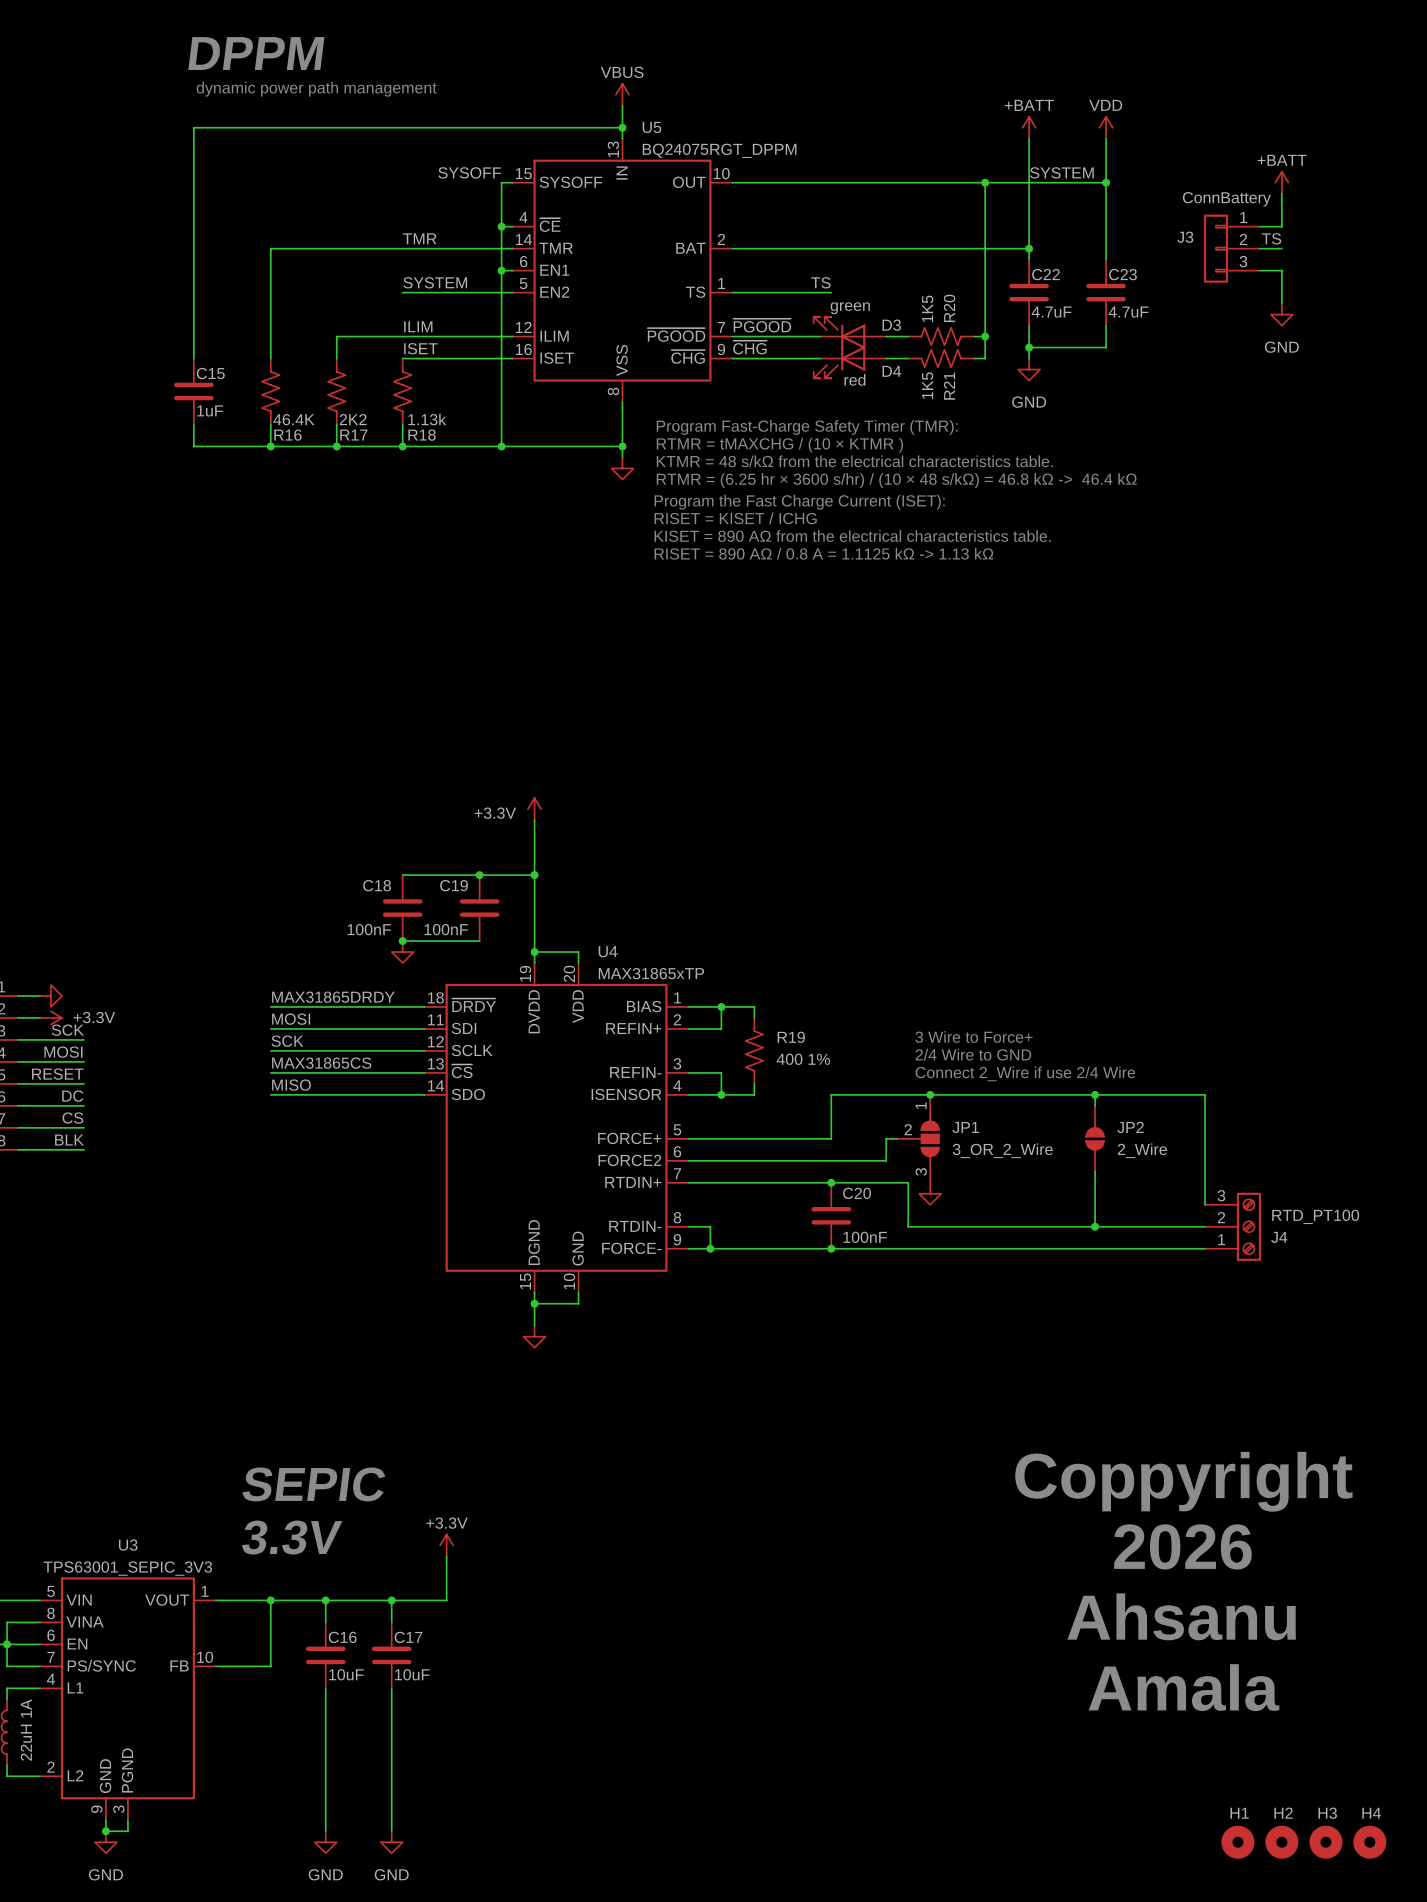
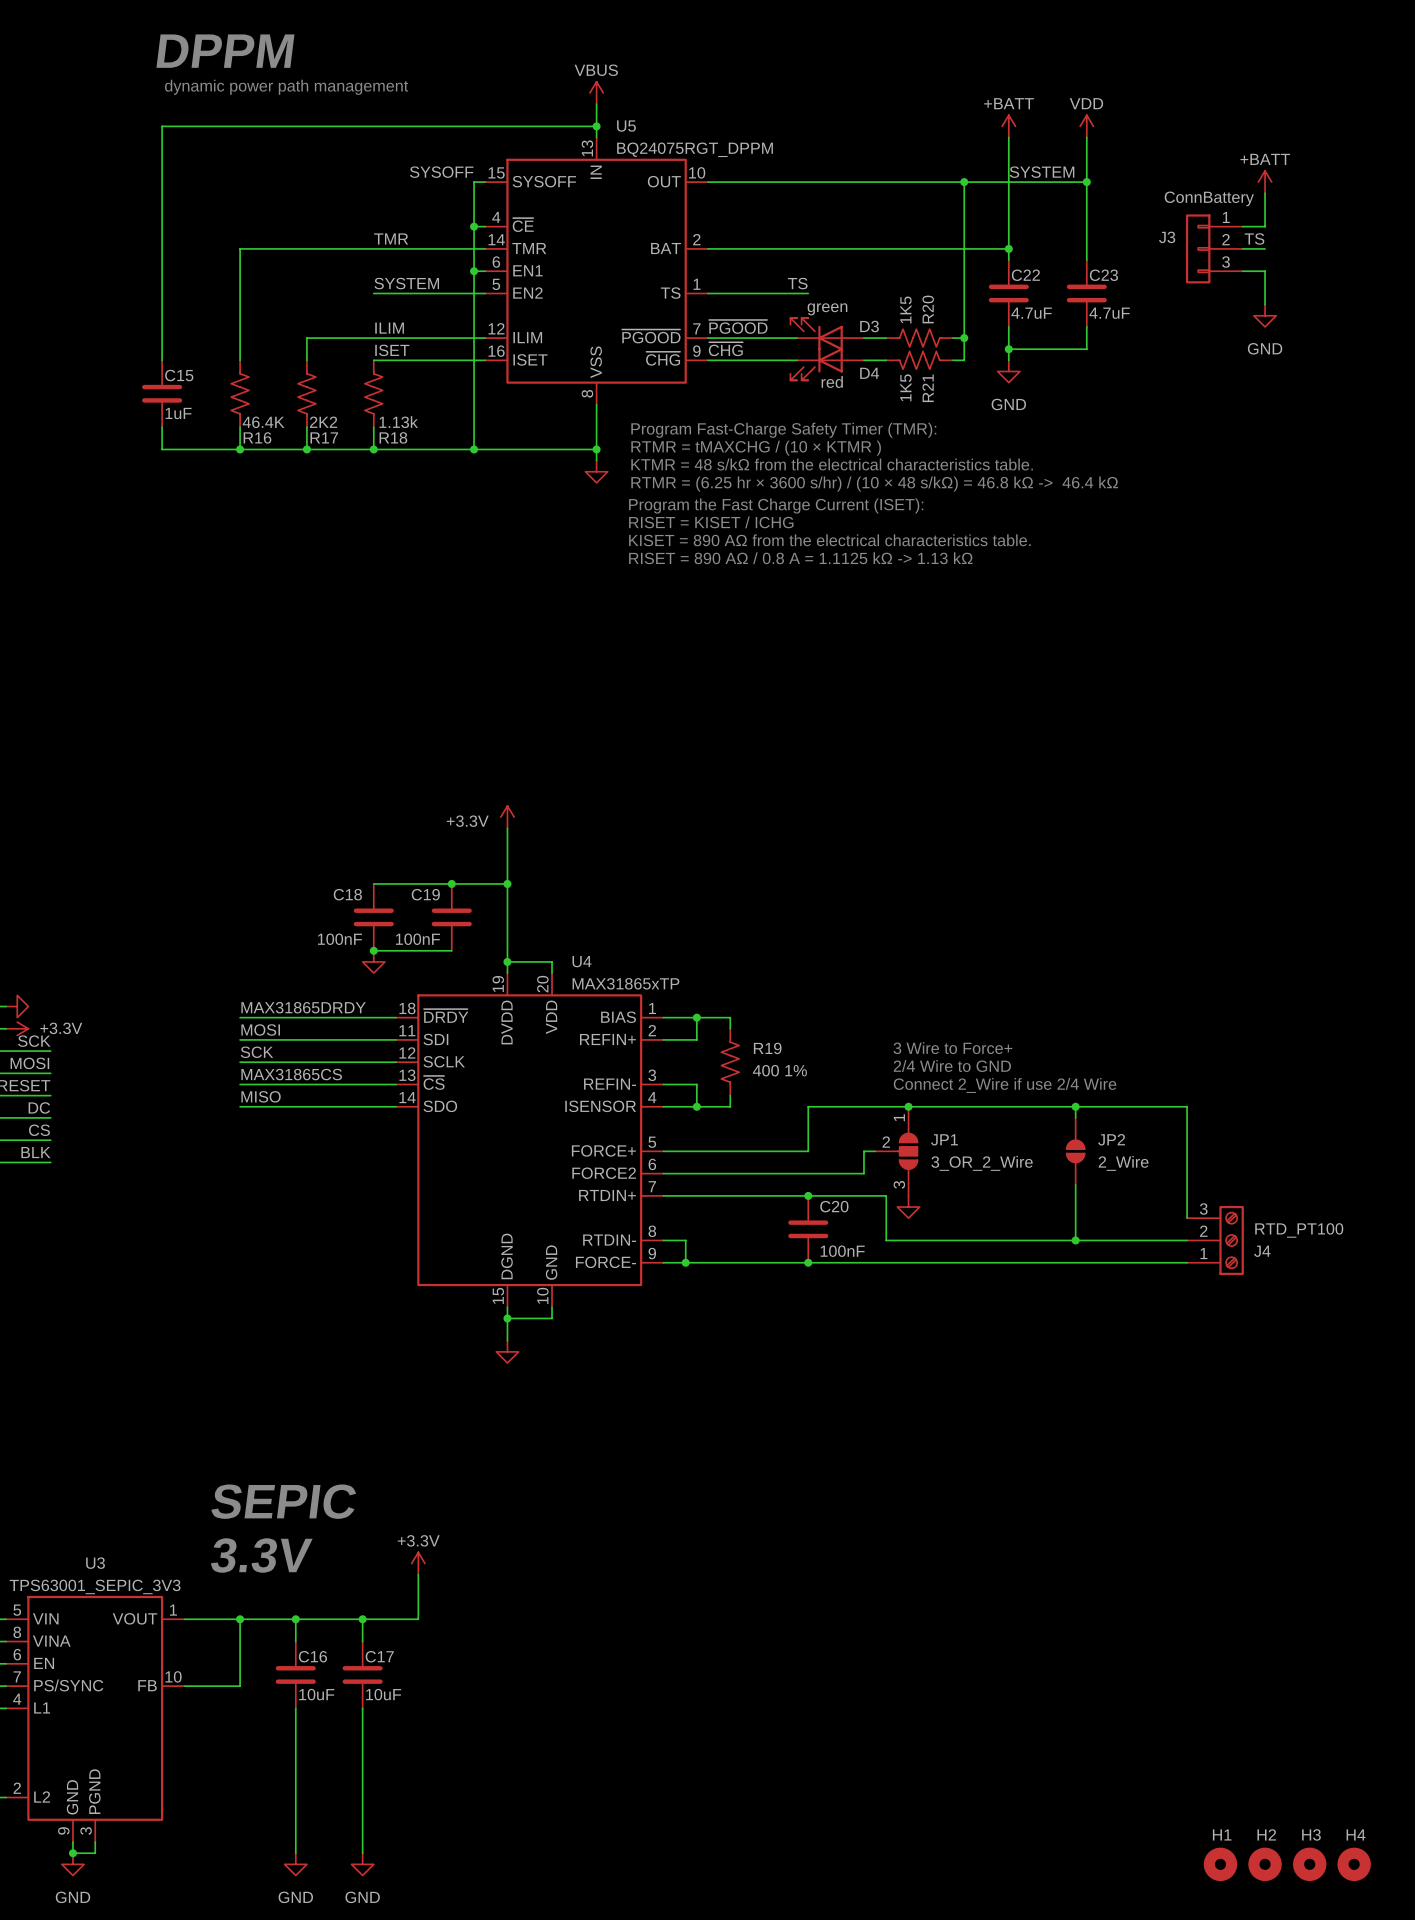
text: Coppyright (1183, 1481) -> none
text: 2026 (1182, 1546) -> none
text: Ahsanu (1181, 1616) -> none
text: Amala (1183, 1687) -> none

